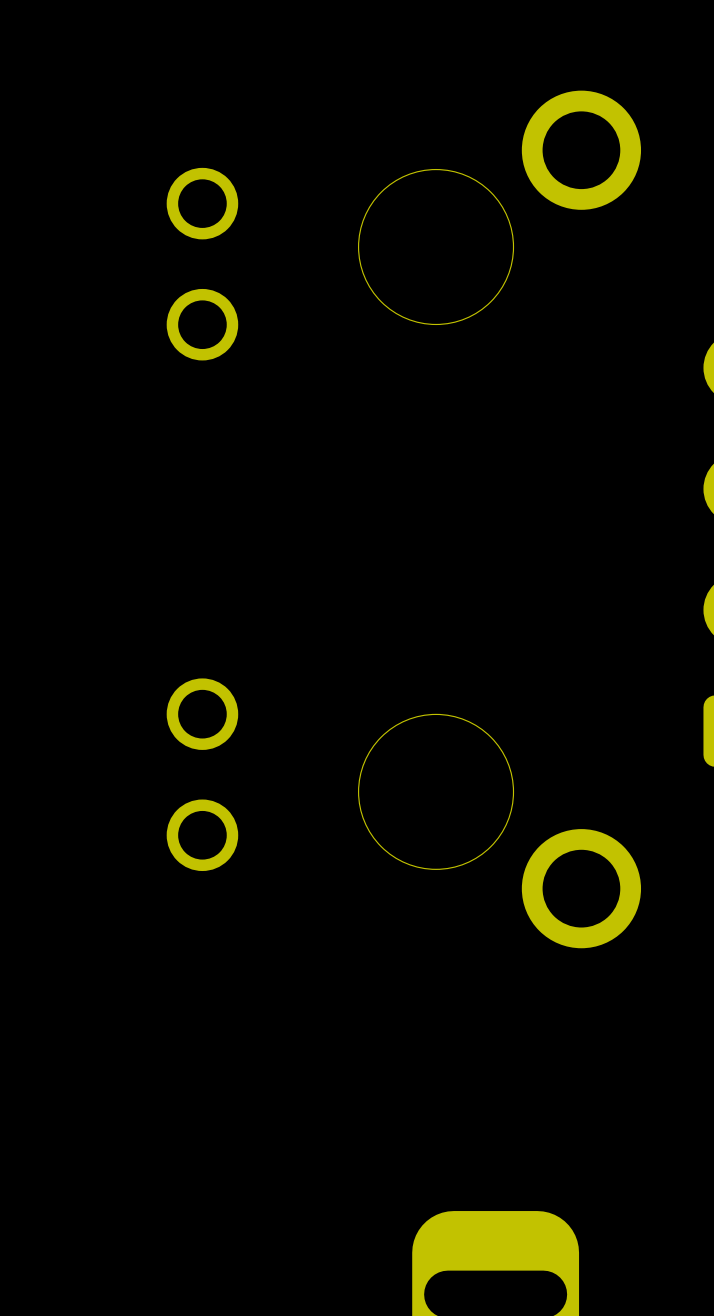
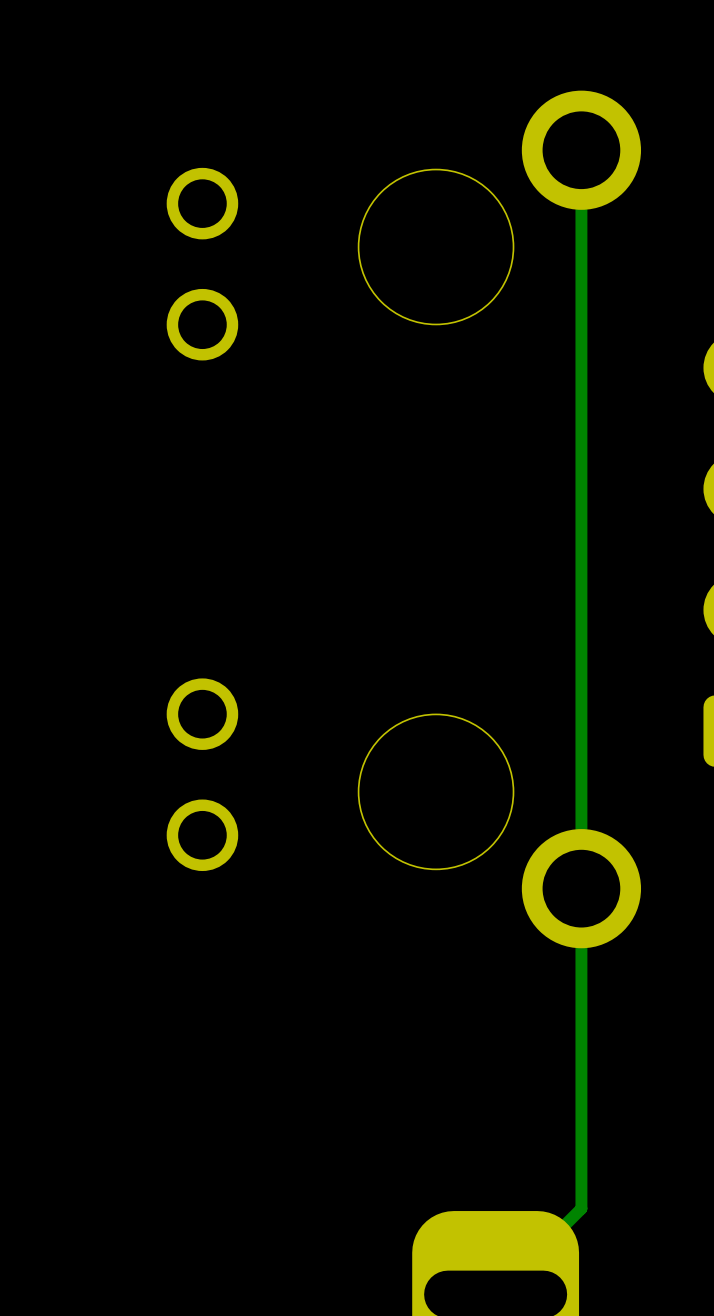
track: none -> (581, 150) (581, 1208) (495, 1294)

